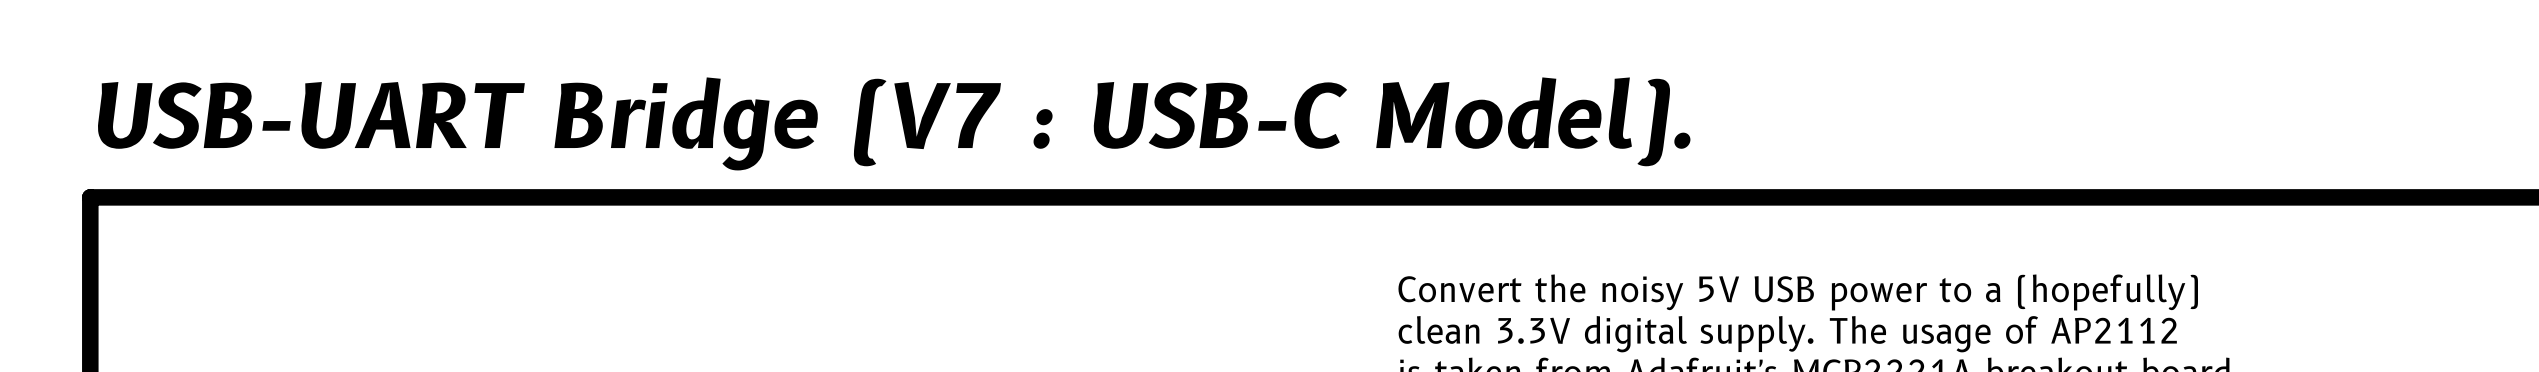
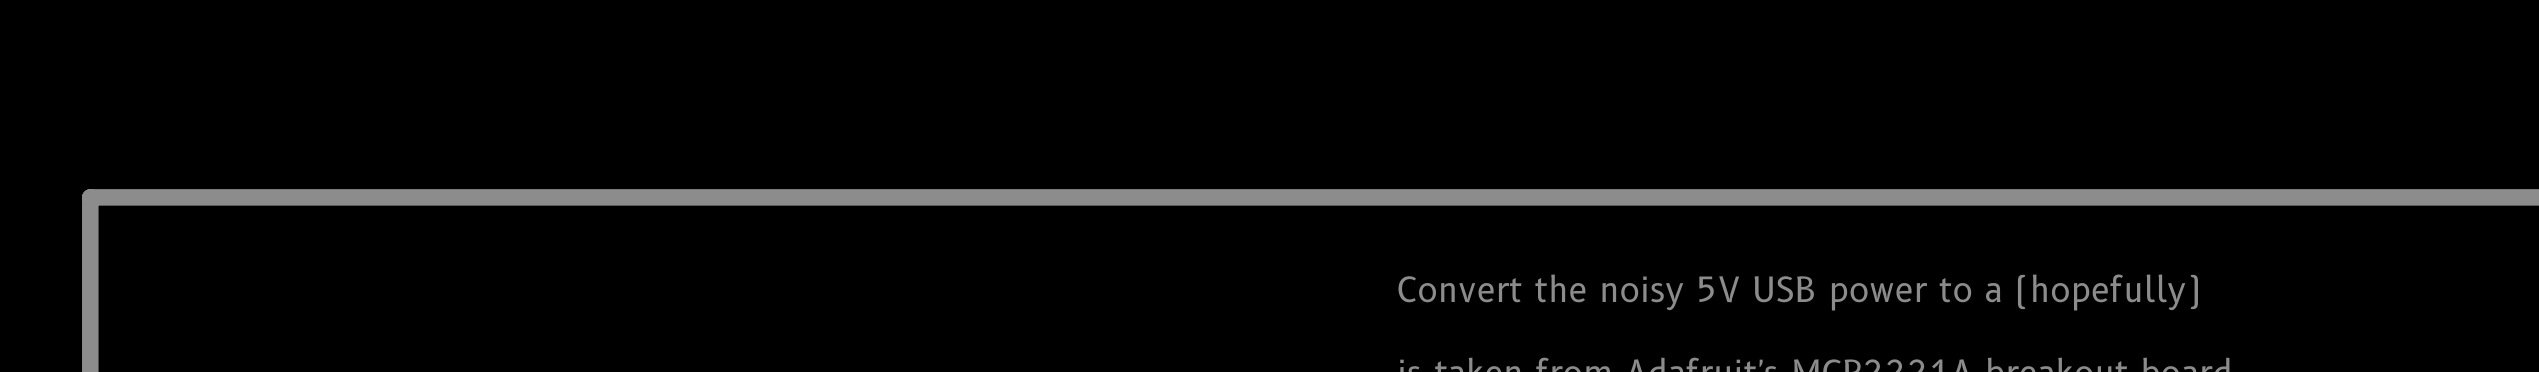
text: USB-UART Bridge (V7 : USB-C Model). (894, 123) -> none
text: clean 3.3V digital supply. The usage of AP2112 (1787, 334) -> none

